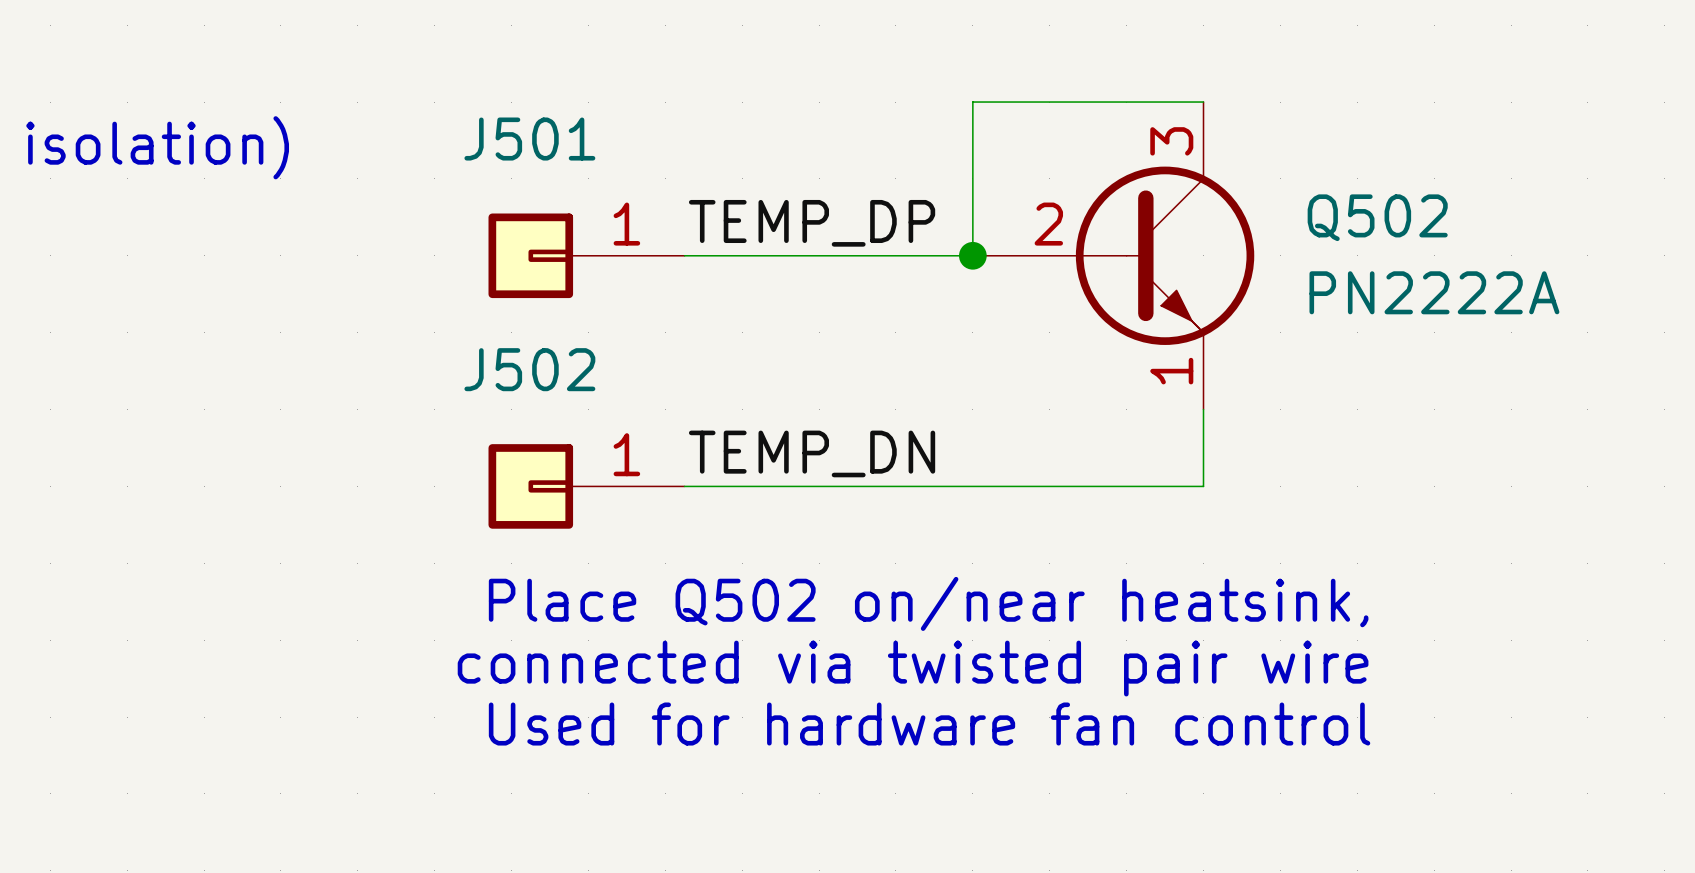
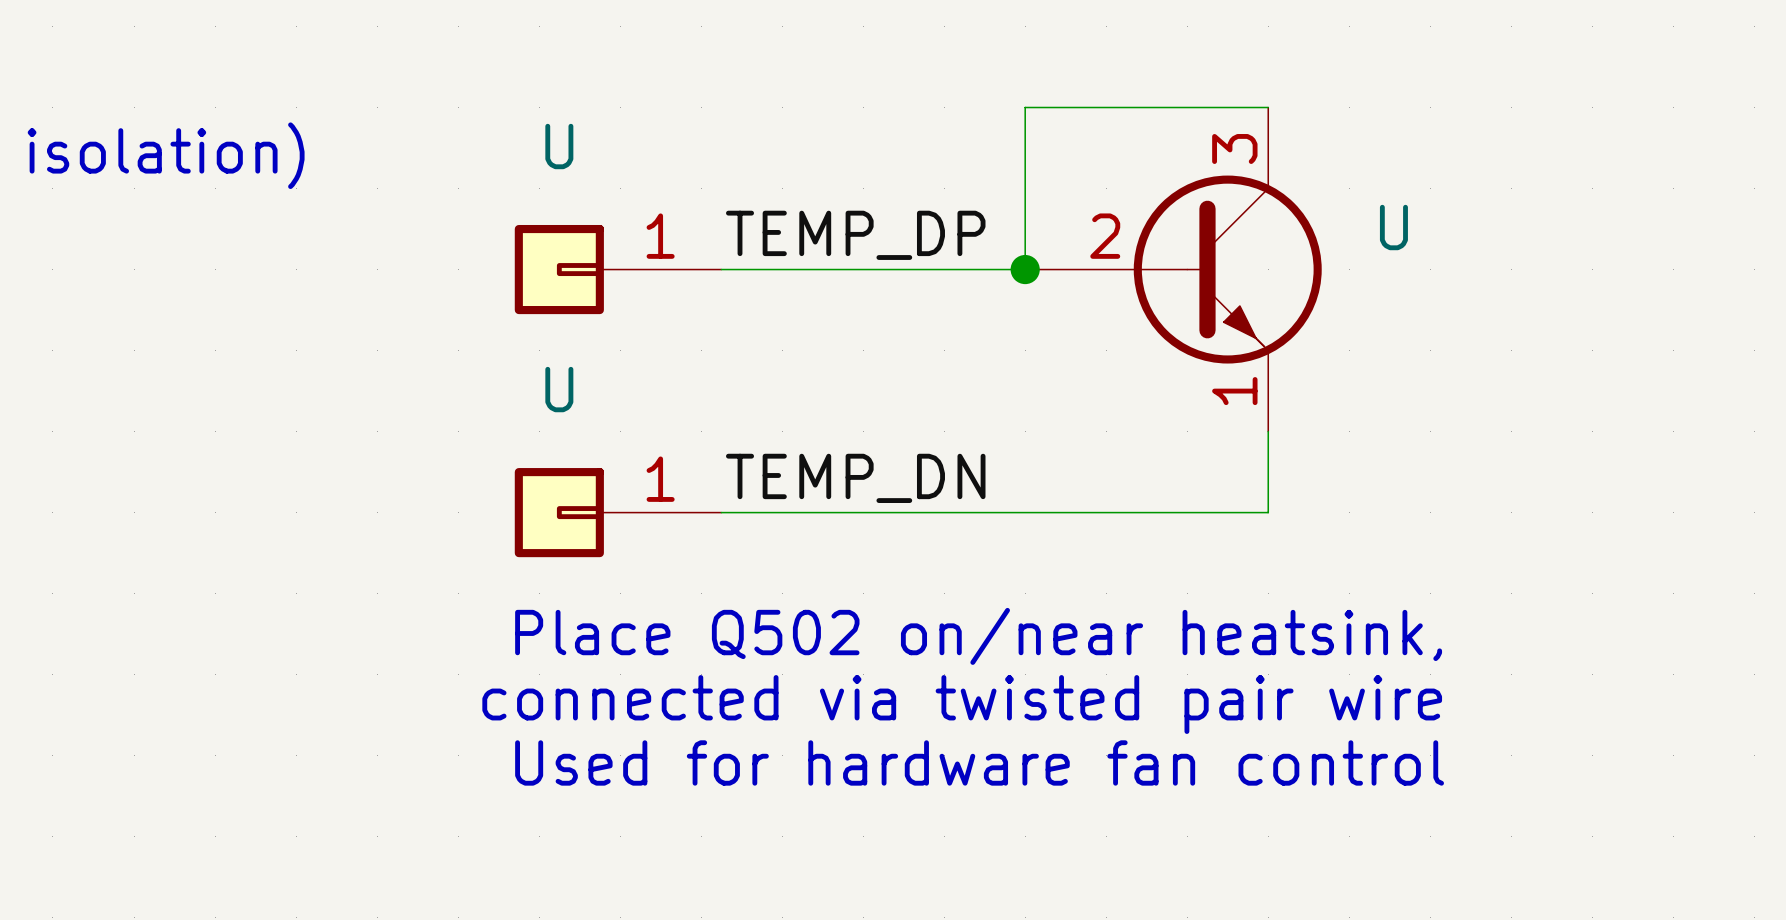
J501 name: J501 (529, 139) -> U (559, 146)
Q502 name: Q502 (1377, 217) -> U (1393, 227)
Q502 value: PN2222A (1434, 292) -> none
J502 name: J502 (529, 369) -> U (559, 389)

